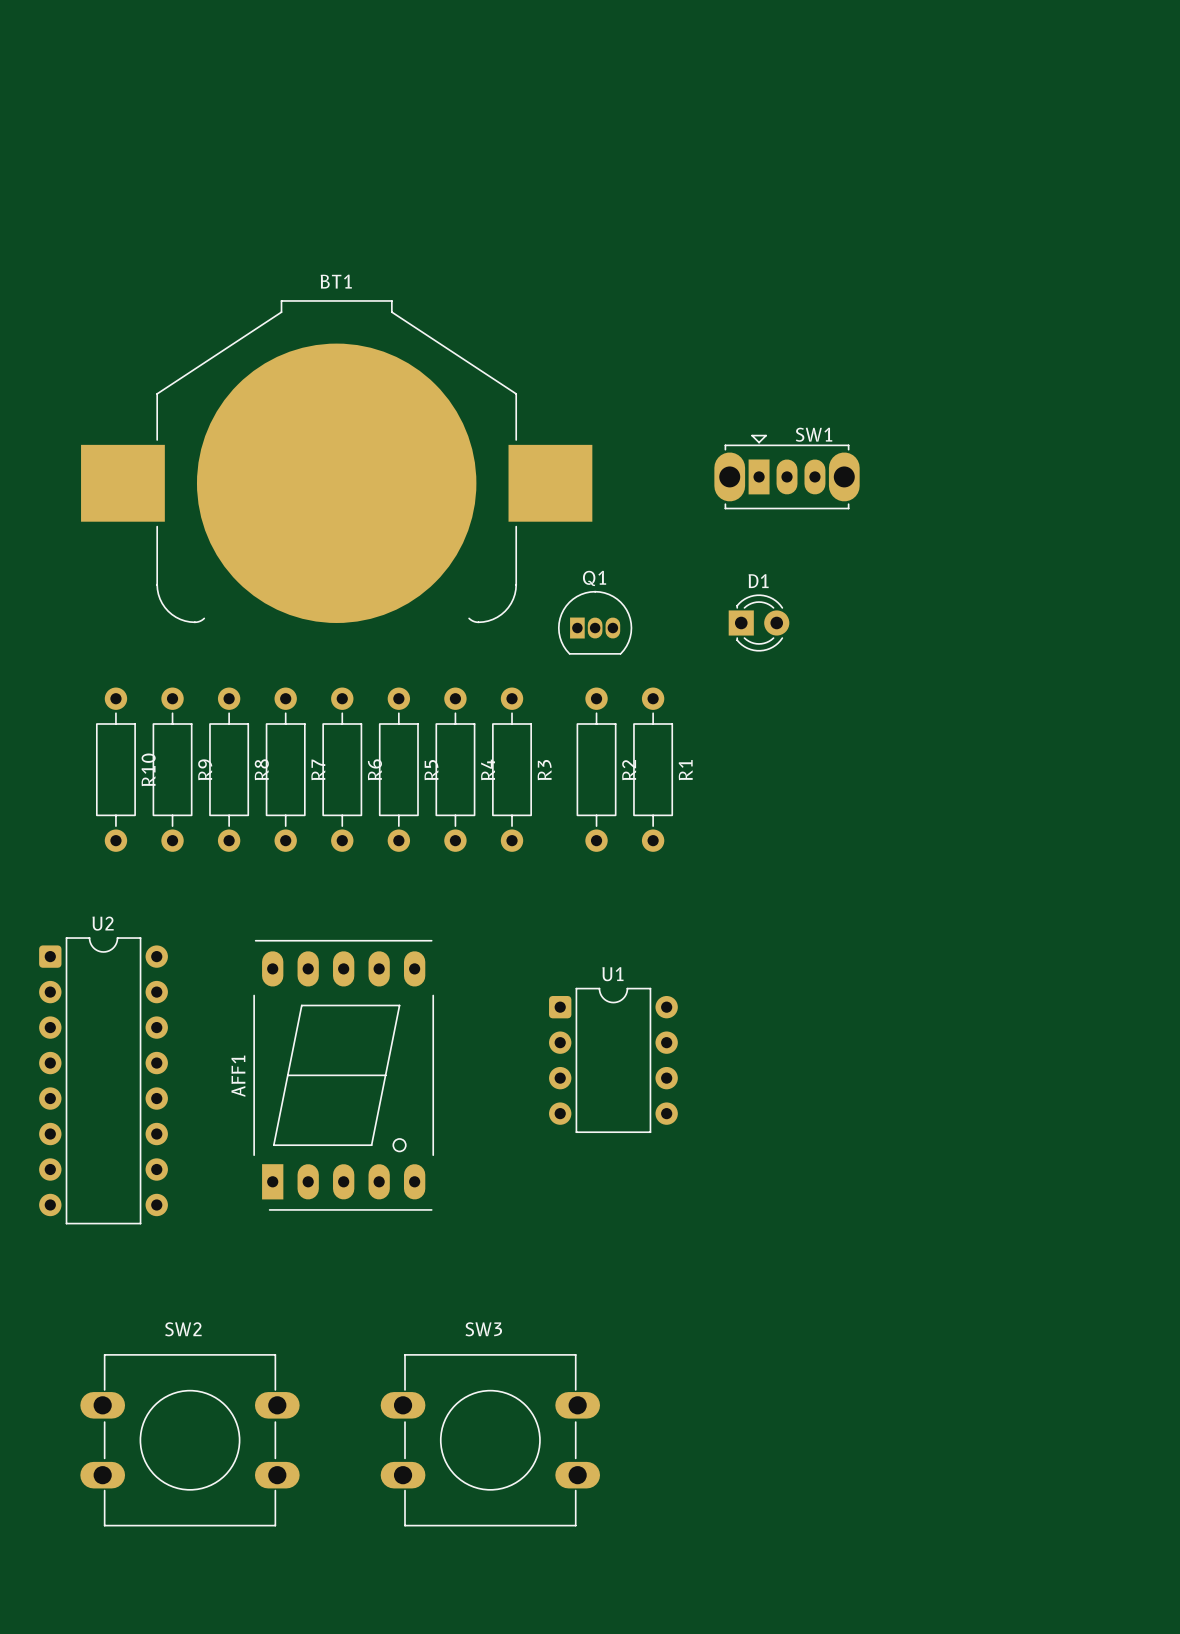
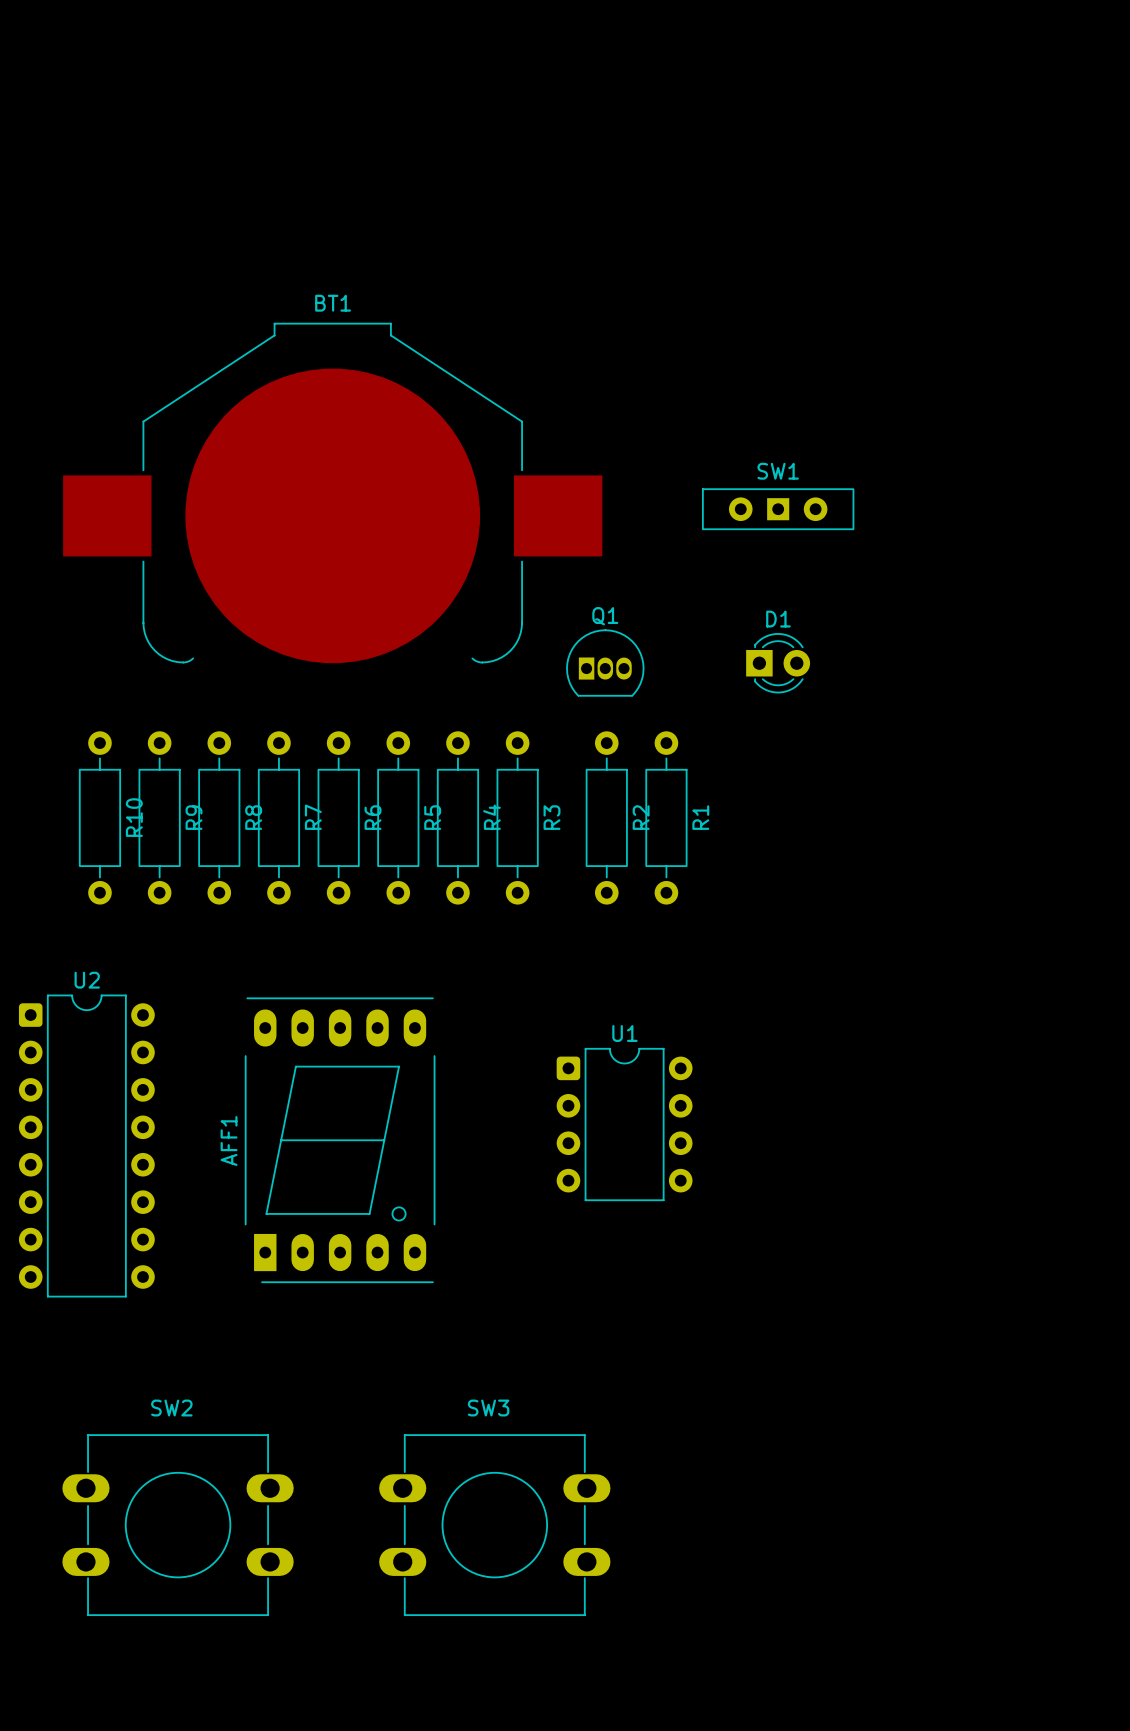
SW1 footprint: [714, 434, 860, 510] -> [702, 488, 855, 531]

